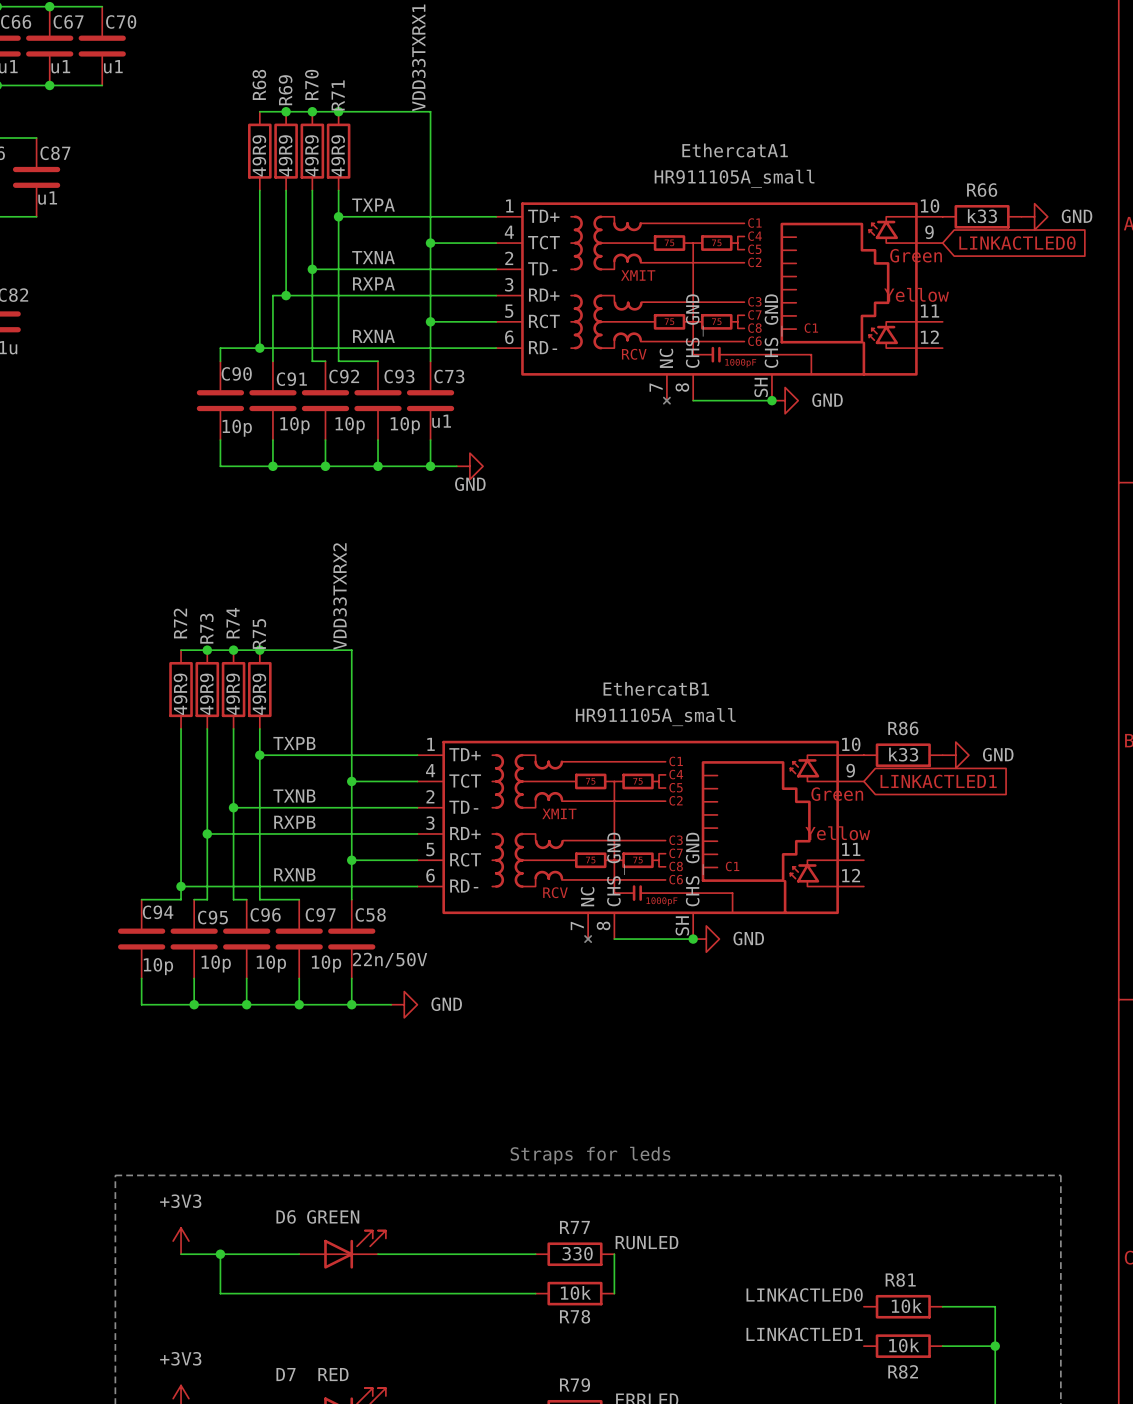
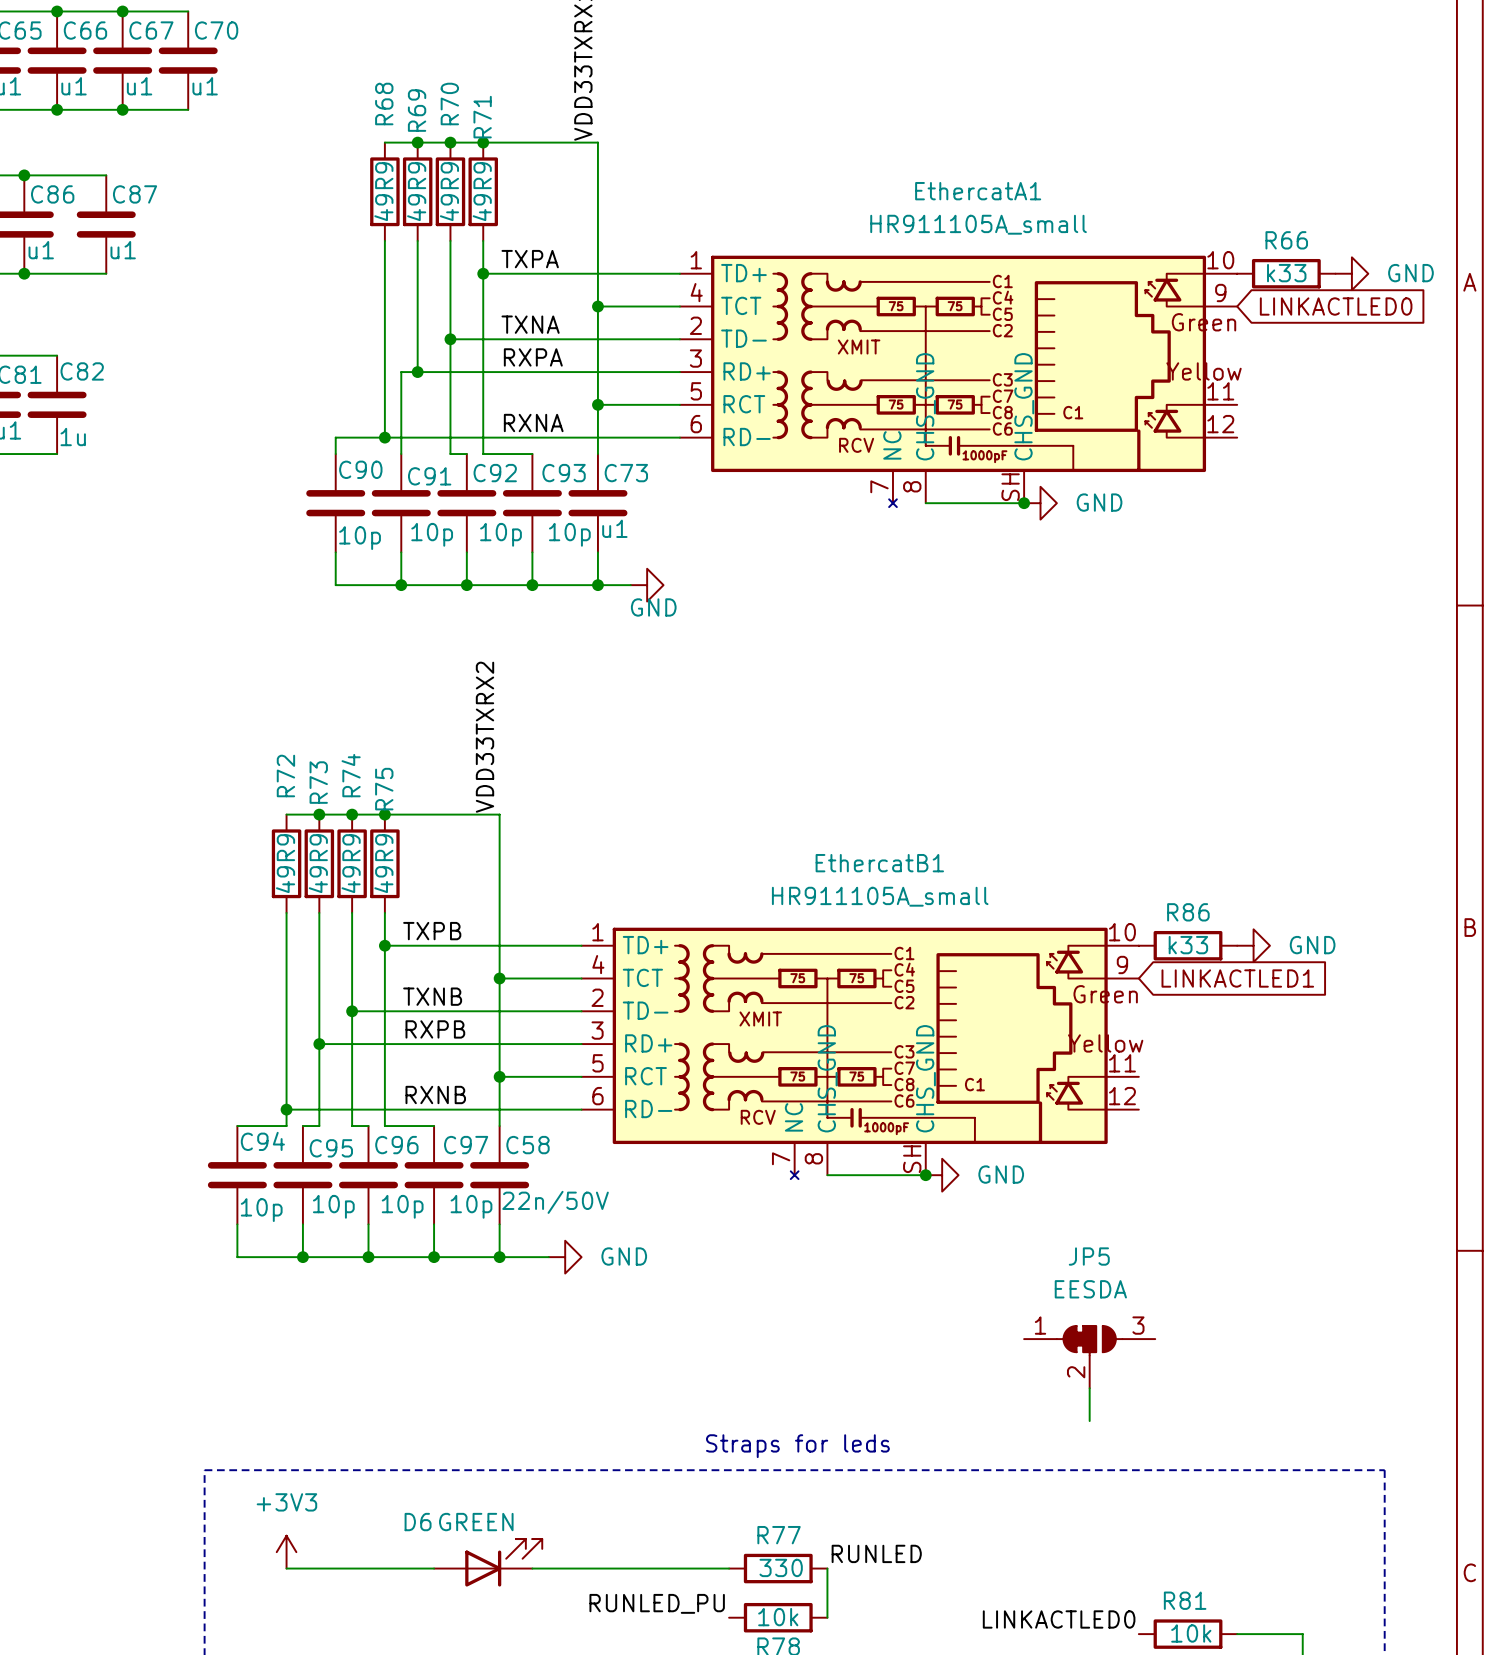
JP5: none -> EESDA (1089, 1357)
wire: none -> (1089, 1388) (1089, 1421)
wire: (220, 1254) (220, 1293) (535, 1293) -> none
junction: (220, 1254) -> none
label: none -> RUNLED_PU (657, 1603)

